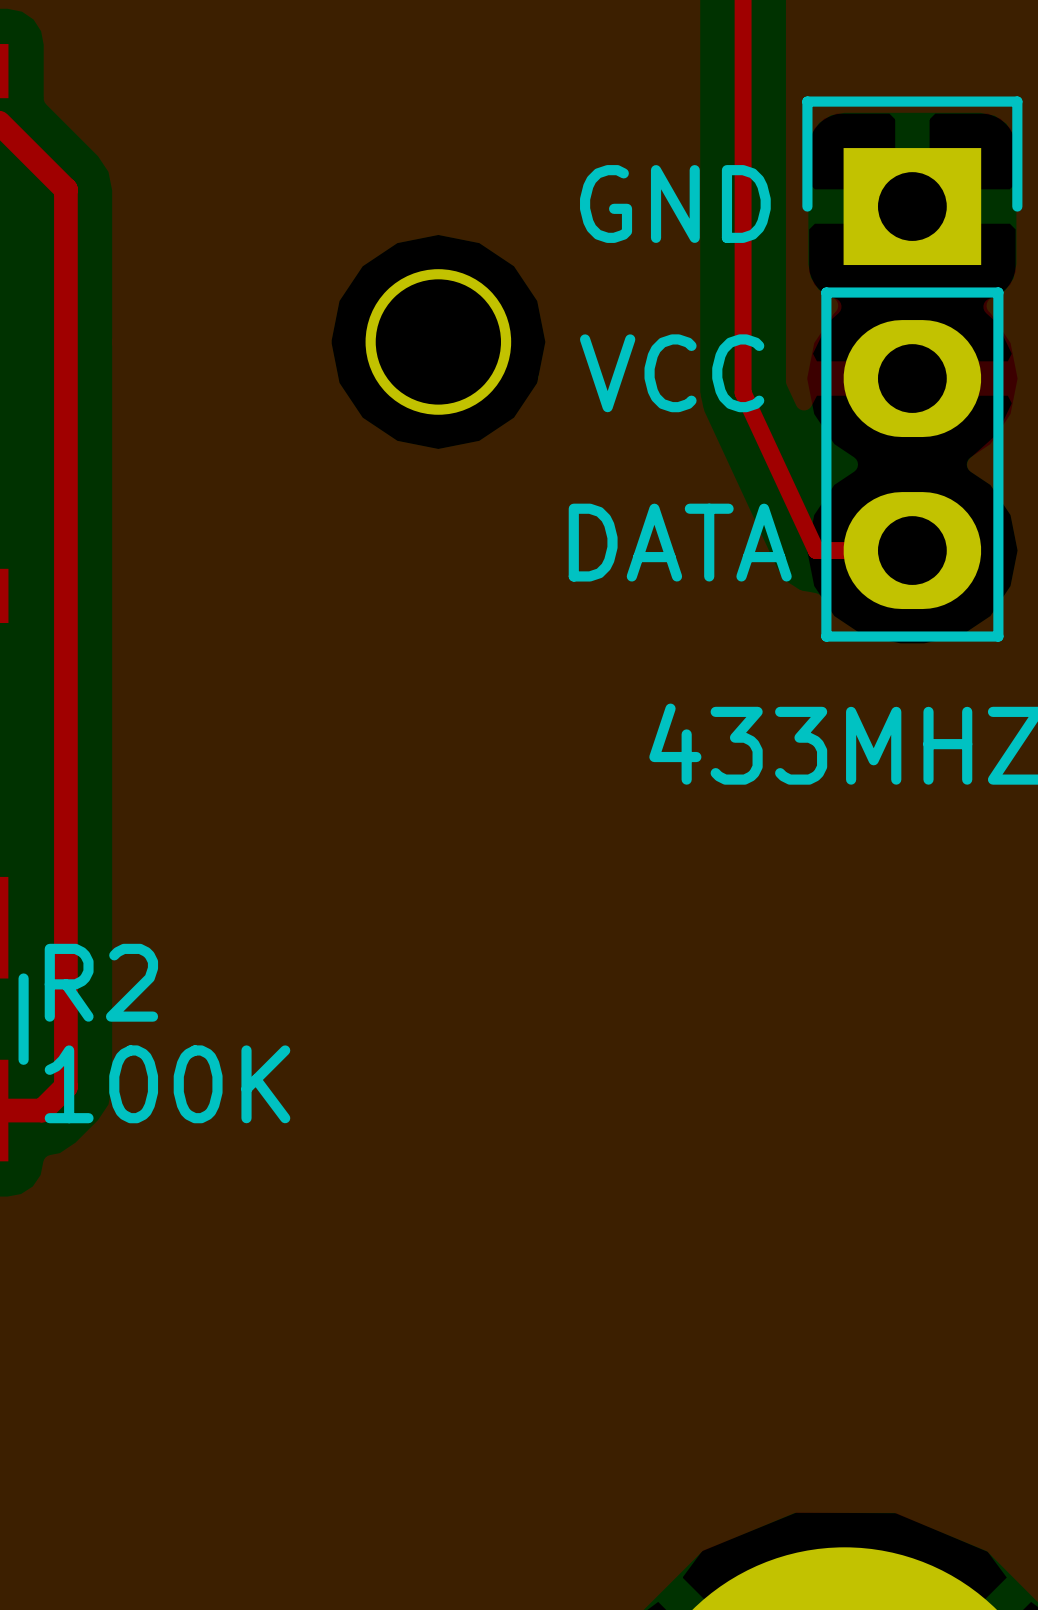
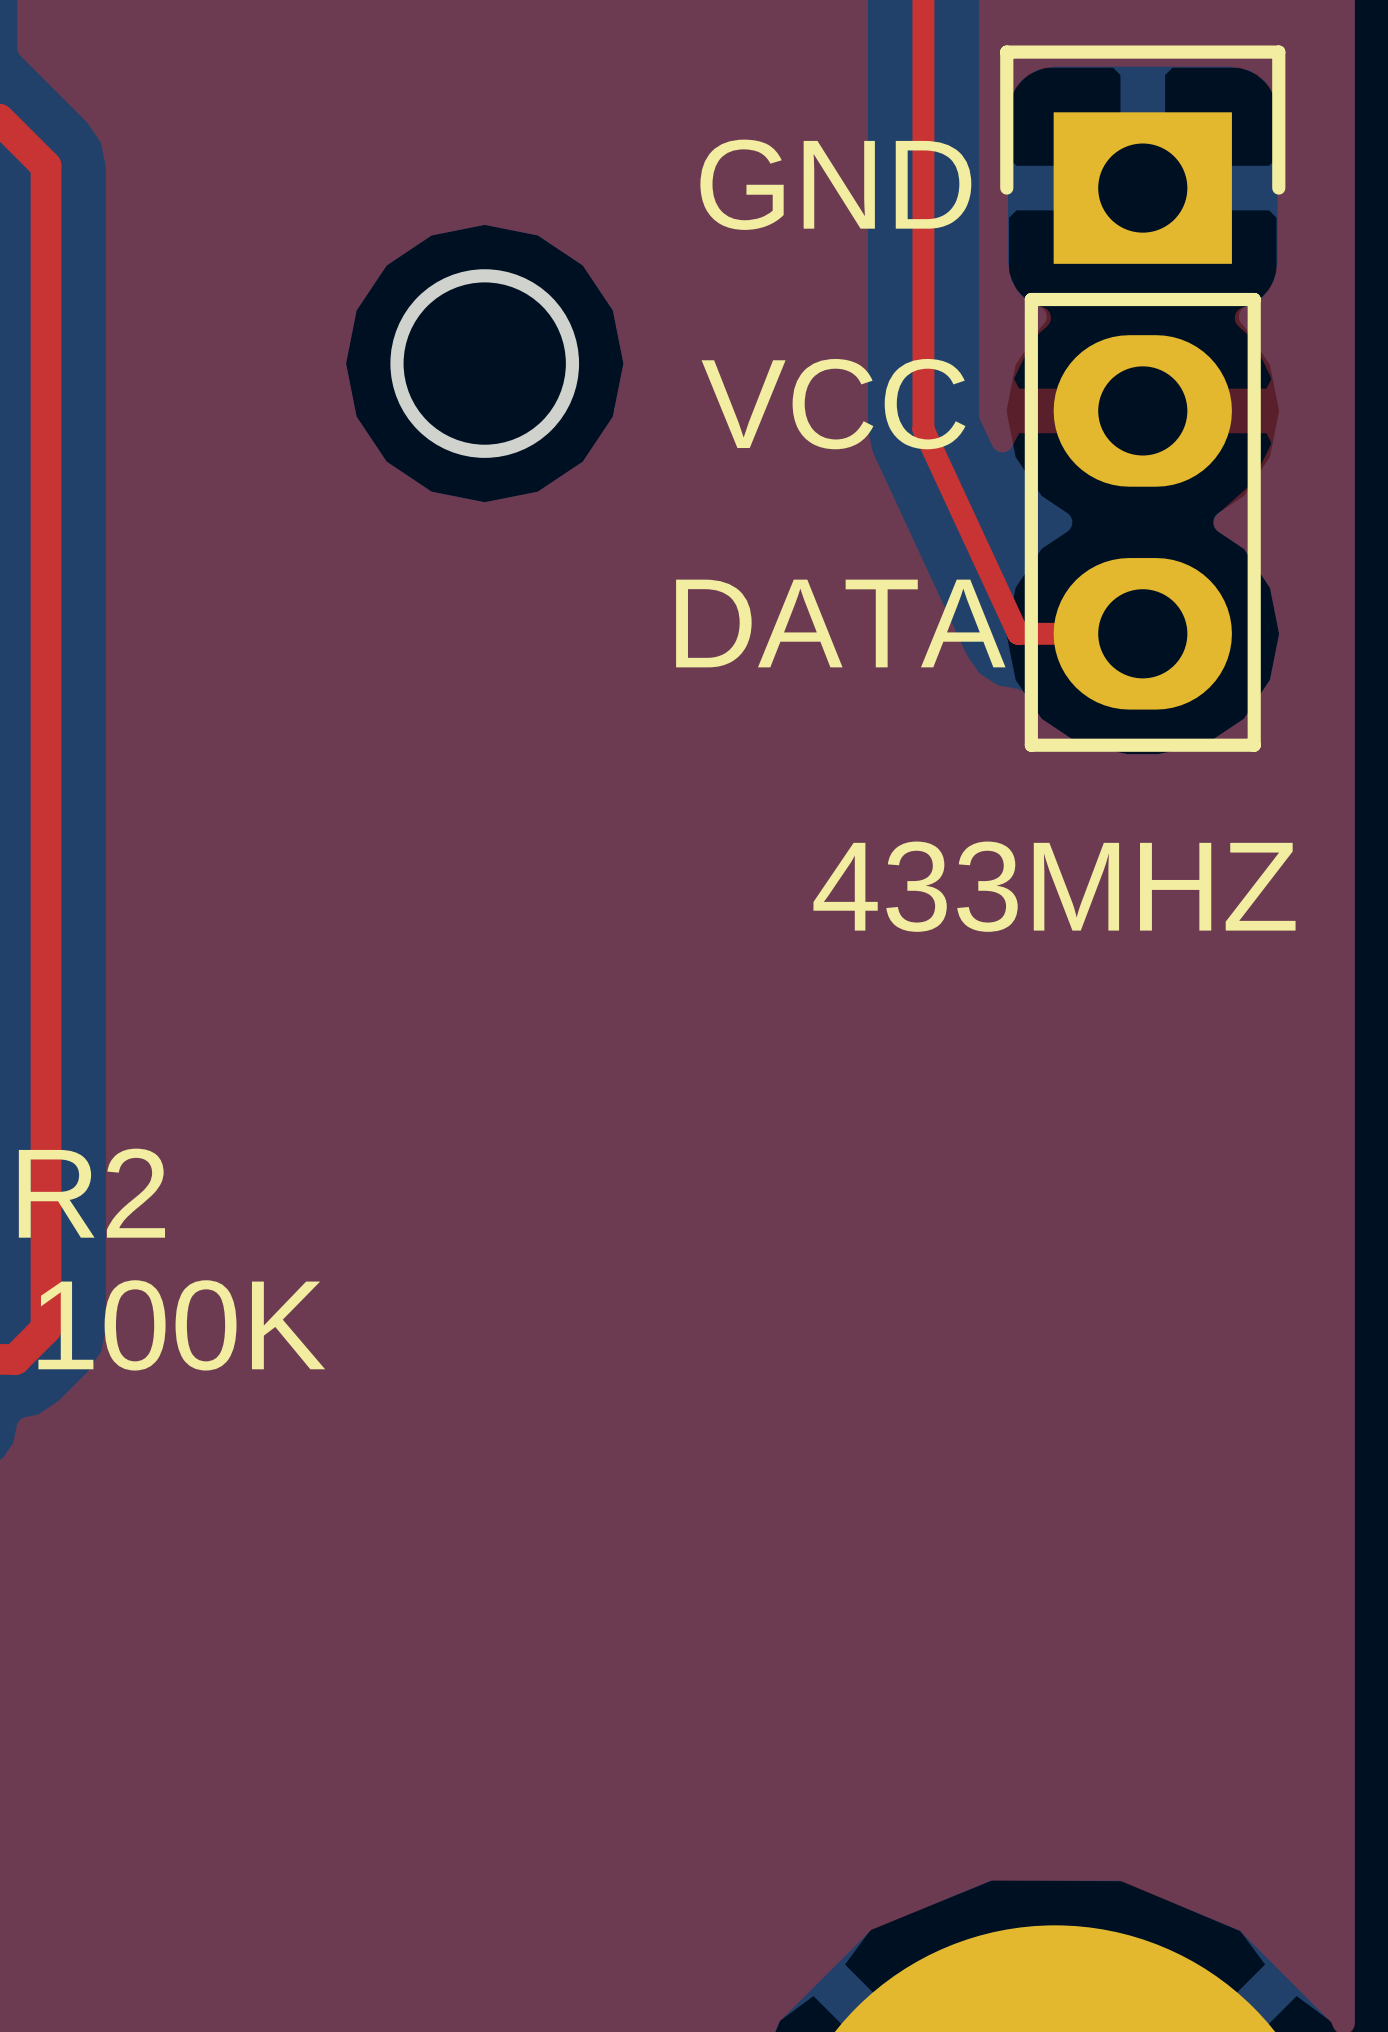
round board edge position: (438, 341) -> (484, 363)

